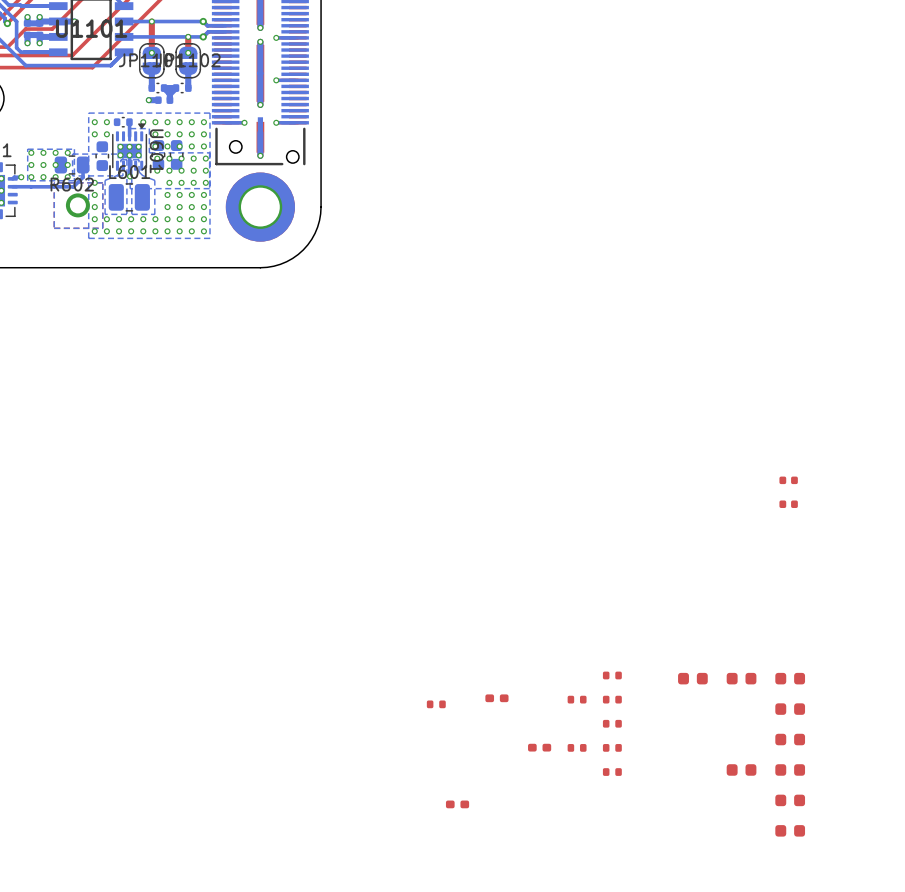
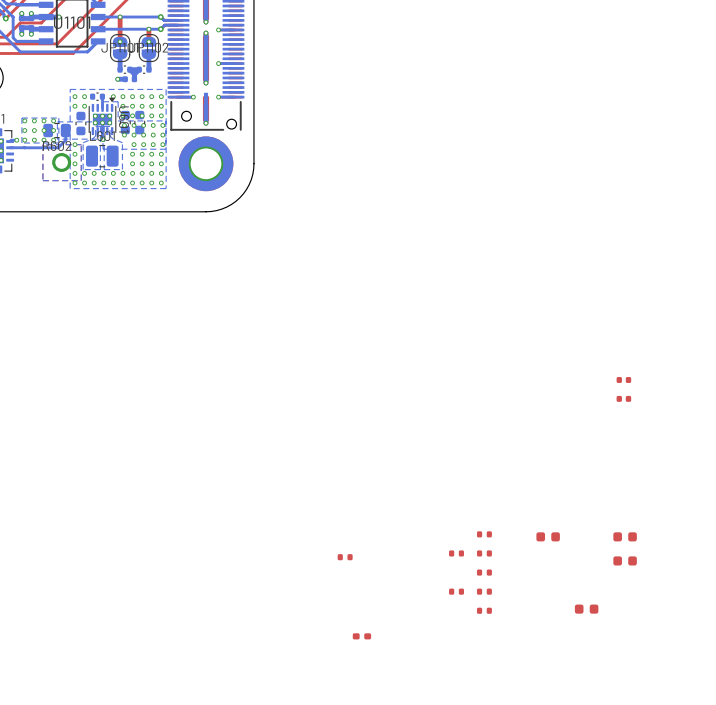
part: (741, 678) -> none
part: (496, 698) -> none
part: (790, 739) -> none
part: (539, 747) -> none
part: (790, 769) -> none
part: (790, 800) -> none
part: (790, 830) -> none

